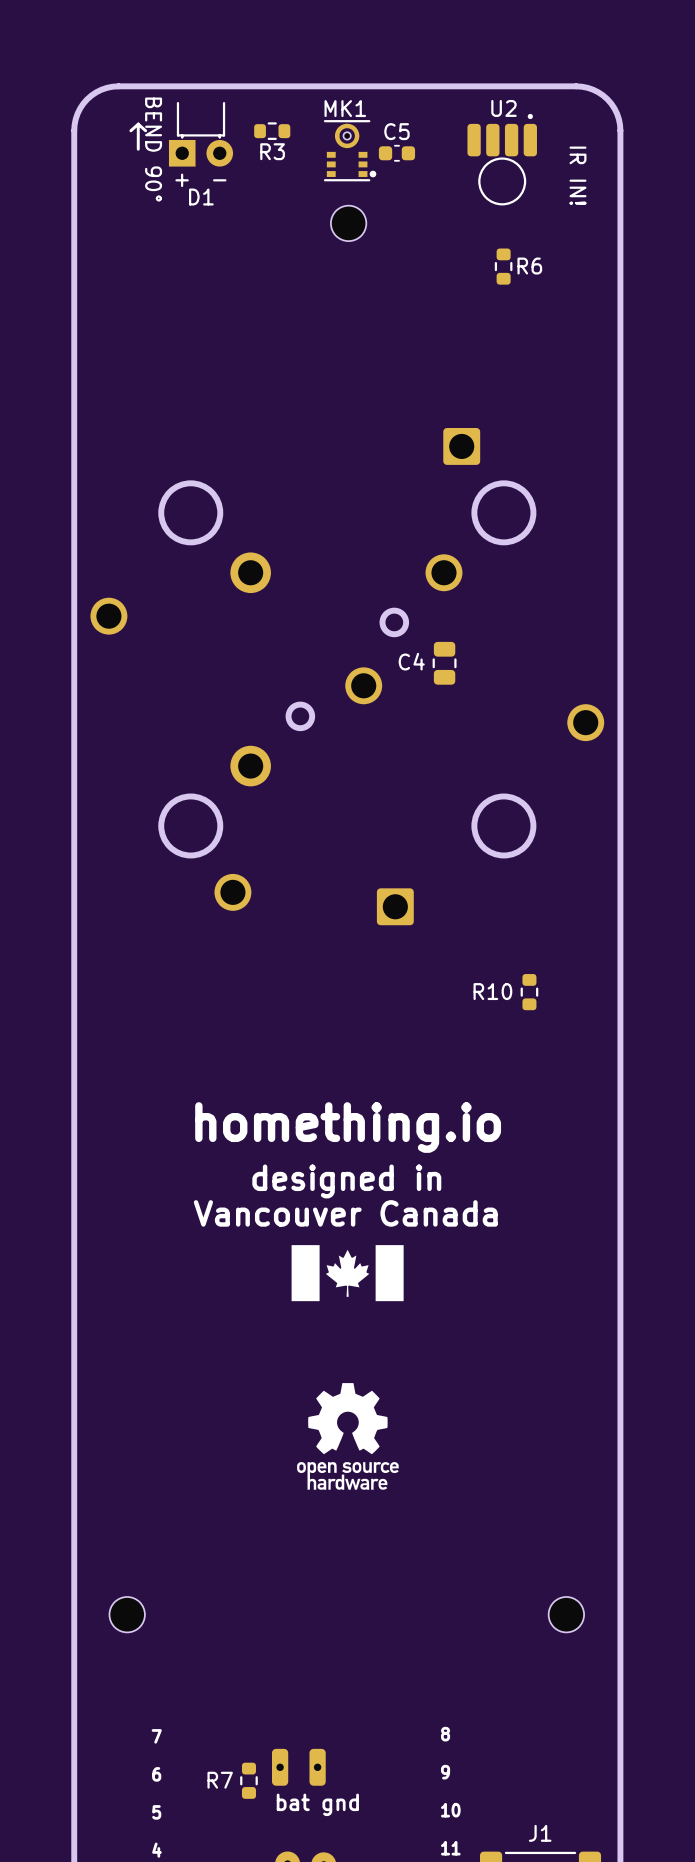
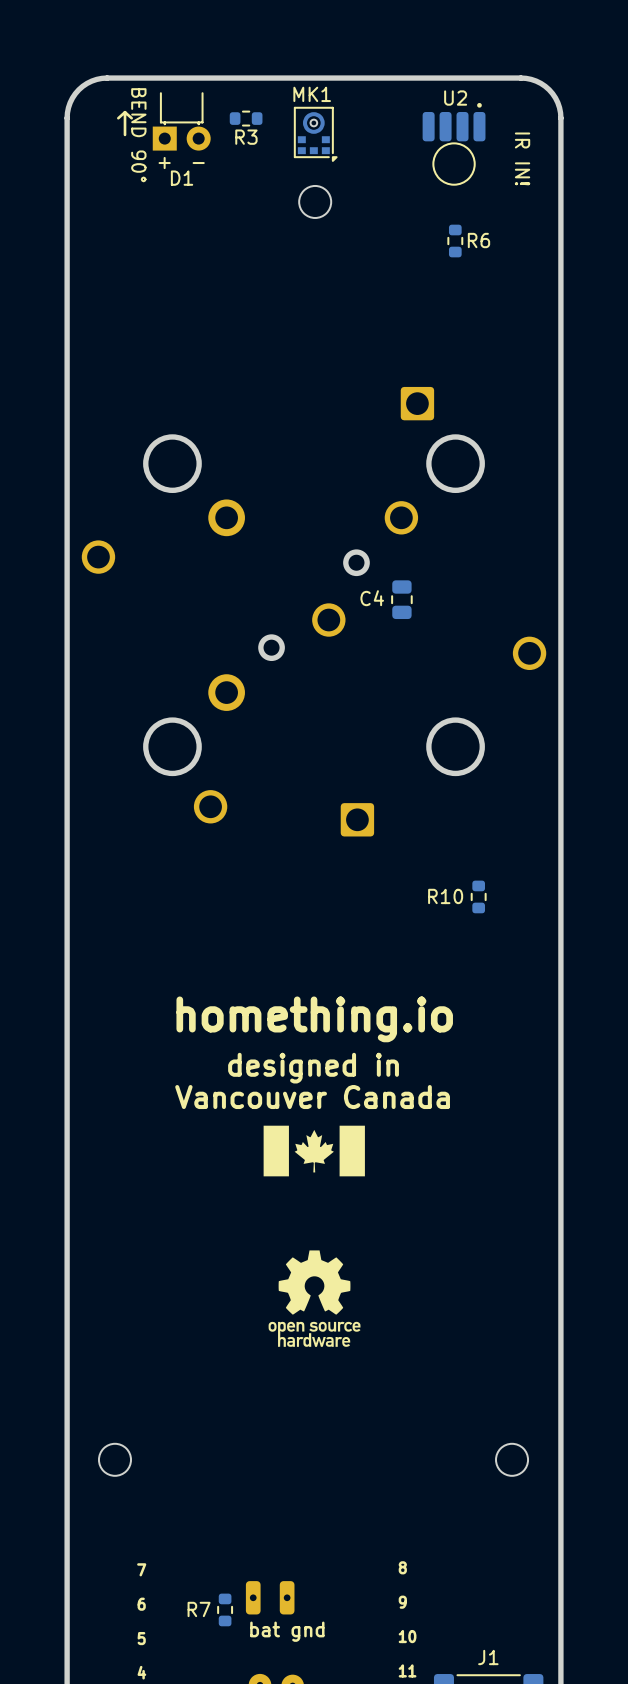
MK1 footprint: [323, 120, 377, 182] -> [293, 106, 338, 162]
C5: (396, 153) -> none

